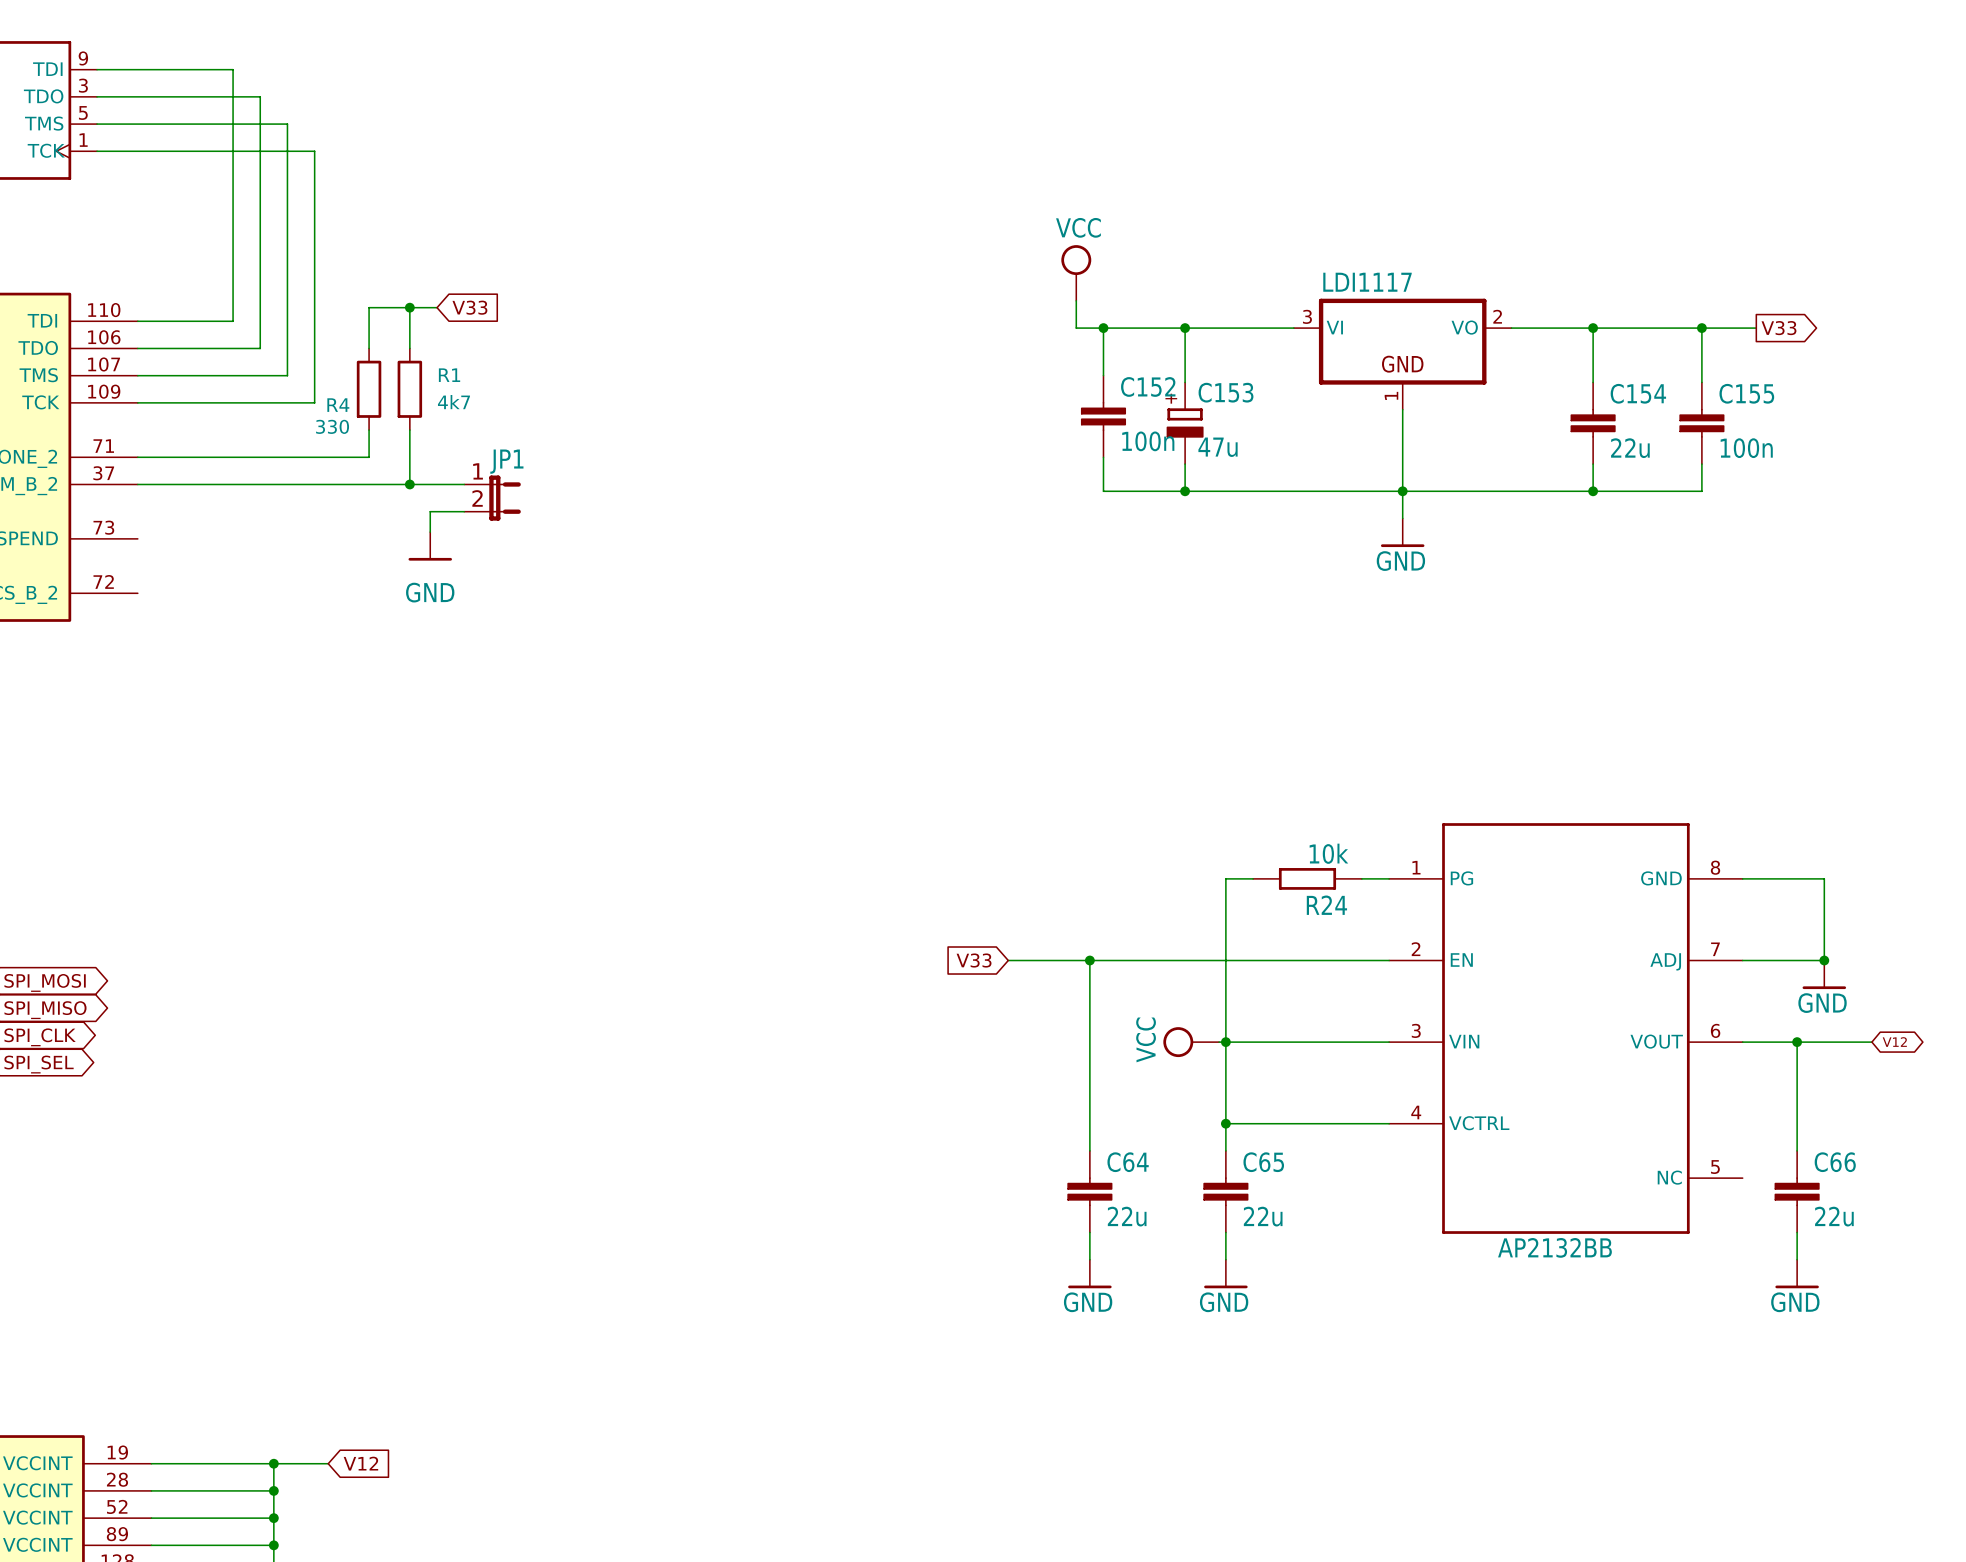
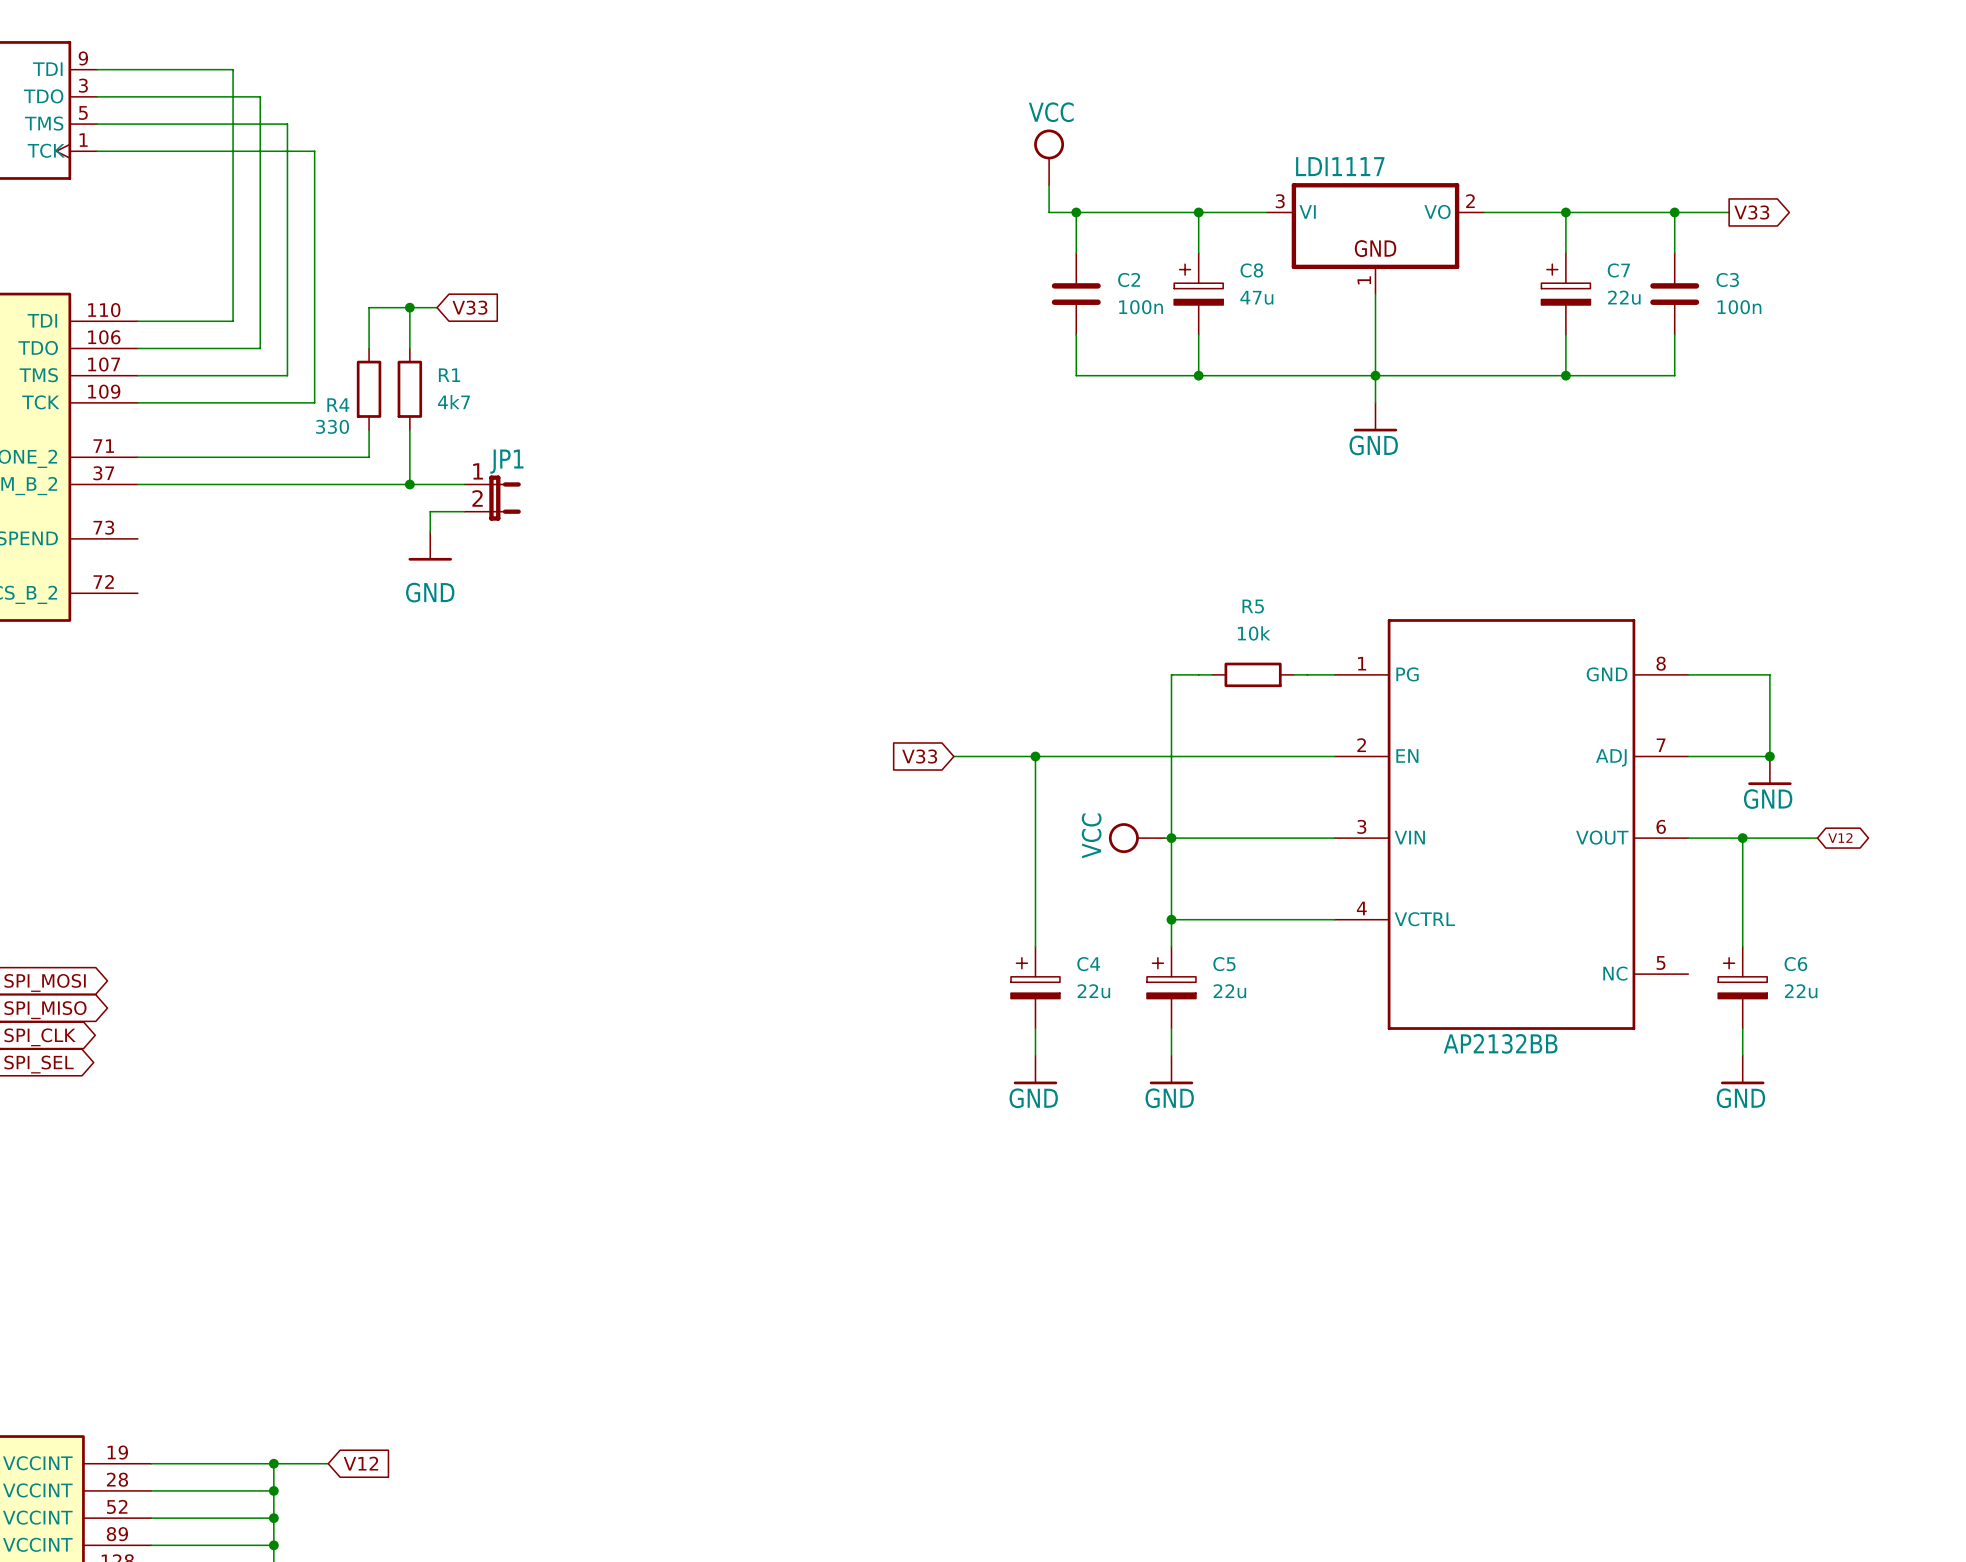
wire: none -> (1076, 212) (1076, 253)
junction: none -> (1076, 212)
wire: none -> (1198, 212) (1198, 253)
junction: none -> (1198, 212)
wire: none -> (1565, 212) (1565, 253)
junction: none -> (1565, 212)
wire: none -> (1674, 212) (1674, 253)
junction: none -> (1674, 212)
power symbol position: VCC (1076, 272) -> VCC (1049, 157)
C2: none -> 100n (1076, 294)
C8: none -> 47u (1198, 294)
C7: none -> 22u (1565, 294)
C3: none -> 100n (1674, 294)
wire: (1076, 300) (1076, 328) (1293, 328) -> (1049, 185) (1049, 212) (1266, 212)
wire: (1103, 328) (1103, 375) -> none
junction: (1103, 328) -> none
wire: (1185, 328) (1185, 382) -> none
junction position: (1185, 328) -> (1198, 375)
wire: (1511, 328) (1756, 328) -> (1484, 212) (1729, 212)
wire: (1593, 328) (1593, 382) -> none
junction position: (1593, 328) -> (1565, 375)
wire: (1701, 328) (1701, 382) -> none
junction: (1701, 328) -> none
global label position: V33 (1778, 328) -> V33 (1751, 212)
wire: none -> (1076, 334) (1076, 375) (1674, 375) (1674, 334)
wire: none -> (1198, 334) (1198, 375)
wire: none -> (1565, 334) (1565, 375)
part position: (1402, 354) -> (1375, 238)
junction: none -> (1375, 375)
wire: (1402, 409) (1402, 518) -> (1375, 294) (1375, 402)
C152: 100n (1103, 416) -> none
C153: 47u (1185, 423) -> none
C154: 22u (1593, 423) -> none
C155: 100n (1701, 423) -> none
wire: (1103, 457) (1103, 491) (1701, 491) (1701, 464) -> none
wire: (1185, 464) (1185, 491) -> none
wire: (1593, 464) (1593, 491) -> none
junction: (1185, 491) -> none
junction: (1402, 491) -> none
junction: (1593, 491) -> none
power symbol position: GND (1402, 532) -> GND (1375, 417)
wire: none -> (1212, 674) (1171, 674) (1171, 946)
R5: none -> 10k (1253, 674)
wire: none -> (1293, 674) (1334, 674)
junction: none -> (1035, 756)
junction: none -> (1769, 756)
power symbol: none -> GND (1769, 770)
junction: none -> (1171, 838)
junction: none -> (1742, 838)
wire: (1253, 878) (1225, 878) (1225, 1150) -> none
R24: 10k (1307, 878) -> none
wire: (1361, 878) (1389, 878) -> none
wire: (1742, 878) (1824, 878) (1824, 960) (1742, 960) -> (1688, 674) (1769, 674) (1769, 756) (1688, 756)
junction: none -> (1171, 919)
global label position: V33 (974, 960) -> V33 (919, 756)
wire: (1008, 960) (1389, 960) -> (953, 756) (1334, 756)
wire: (1089, 960) (1089, 1150) -> (1035, 756) (1035, 946)
junction: (1089, 960) -> none
junction: (1824, 960) -> none
power symbol: GND (1824, 974) -> none
C4: none -> 22u (1035, 987)
C5: none -> 22u (1171, 987)
C6: none -> 22u (1742, 987)
part position: (1565, 1028) -> (1511, 824)
power symbol position: VCC (1191, 1042) -> VCC (1136, 838)
wire: (1219, 1042) (1389, 1042) -> (1164, 838) (1334, 838)
junction: (1225, 1042) -> none
wire: (1742, 1042) (1871, 1042) -> (1688, 838) (1817, 838)
wire: (1797, 1042) (1797, 1150) -> (1742, 838) (1742, 946)
junction: (1797, 1042) -> none
global label position: V12 (1894, 1042) -> V12 (1840, 838)
power symbol: none -> GND (1035, 1069)
power symbol: none -> GND (1171, 1069)
power symbol: none -> GND (1742, 1069)
wire: (1225, 1123) (1389, 1123) -> (1171, 919) (1334, 919)
junction: (1225, 1123) -> none
C64: 22u (1089, 1191) -> none
C65: 22u (1225, 1191) -> none
C66: 22u (1797, 1191) -> none
wire: (1089, 1232) (1089, 1259) -> (1035, 1028) (1035, 1055)
wire: (1225, 1232) (1225, 1259) -> (1171, 1028) (1171, 1055)
wire: (1797, 1232) (1797, 1259) -> (1742, 1028) (1742, 1055)
power symbol: GND (1089, 1274) -> none
power symbol: GND (1225, 1274) -> none
power symbol: GND (1797, 1274) -> none

